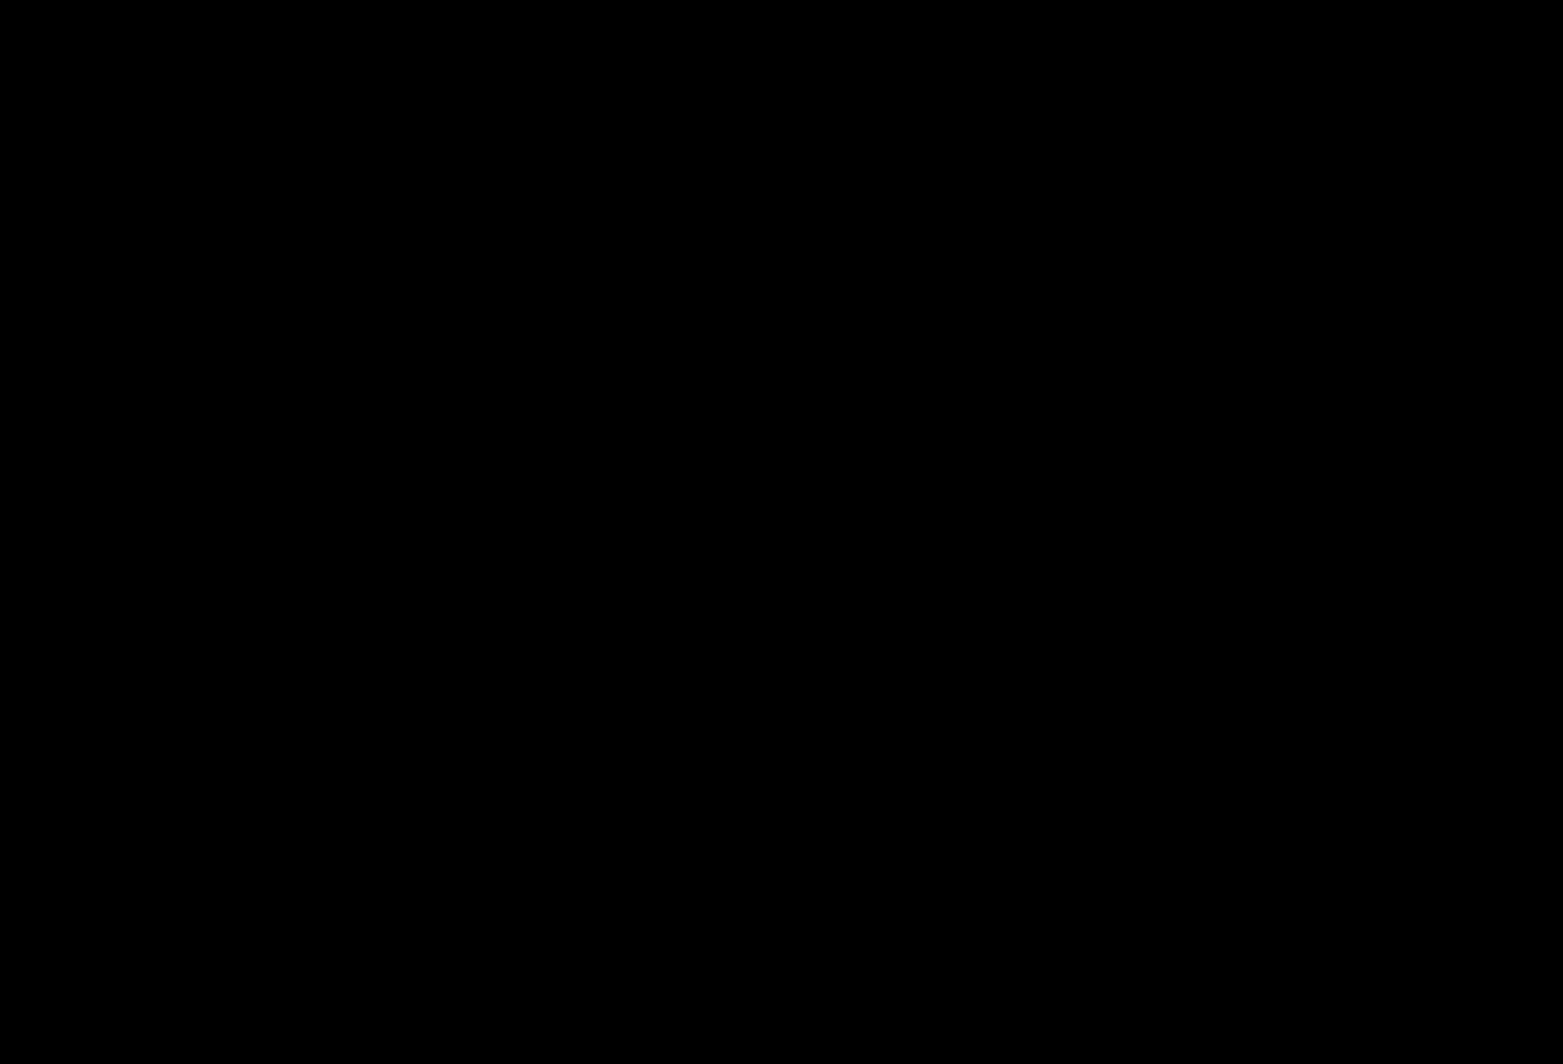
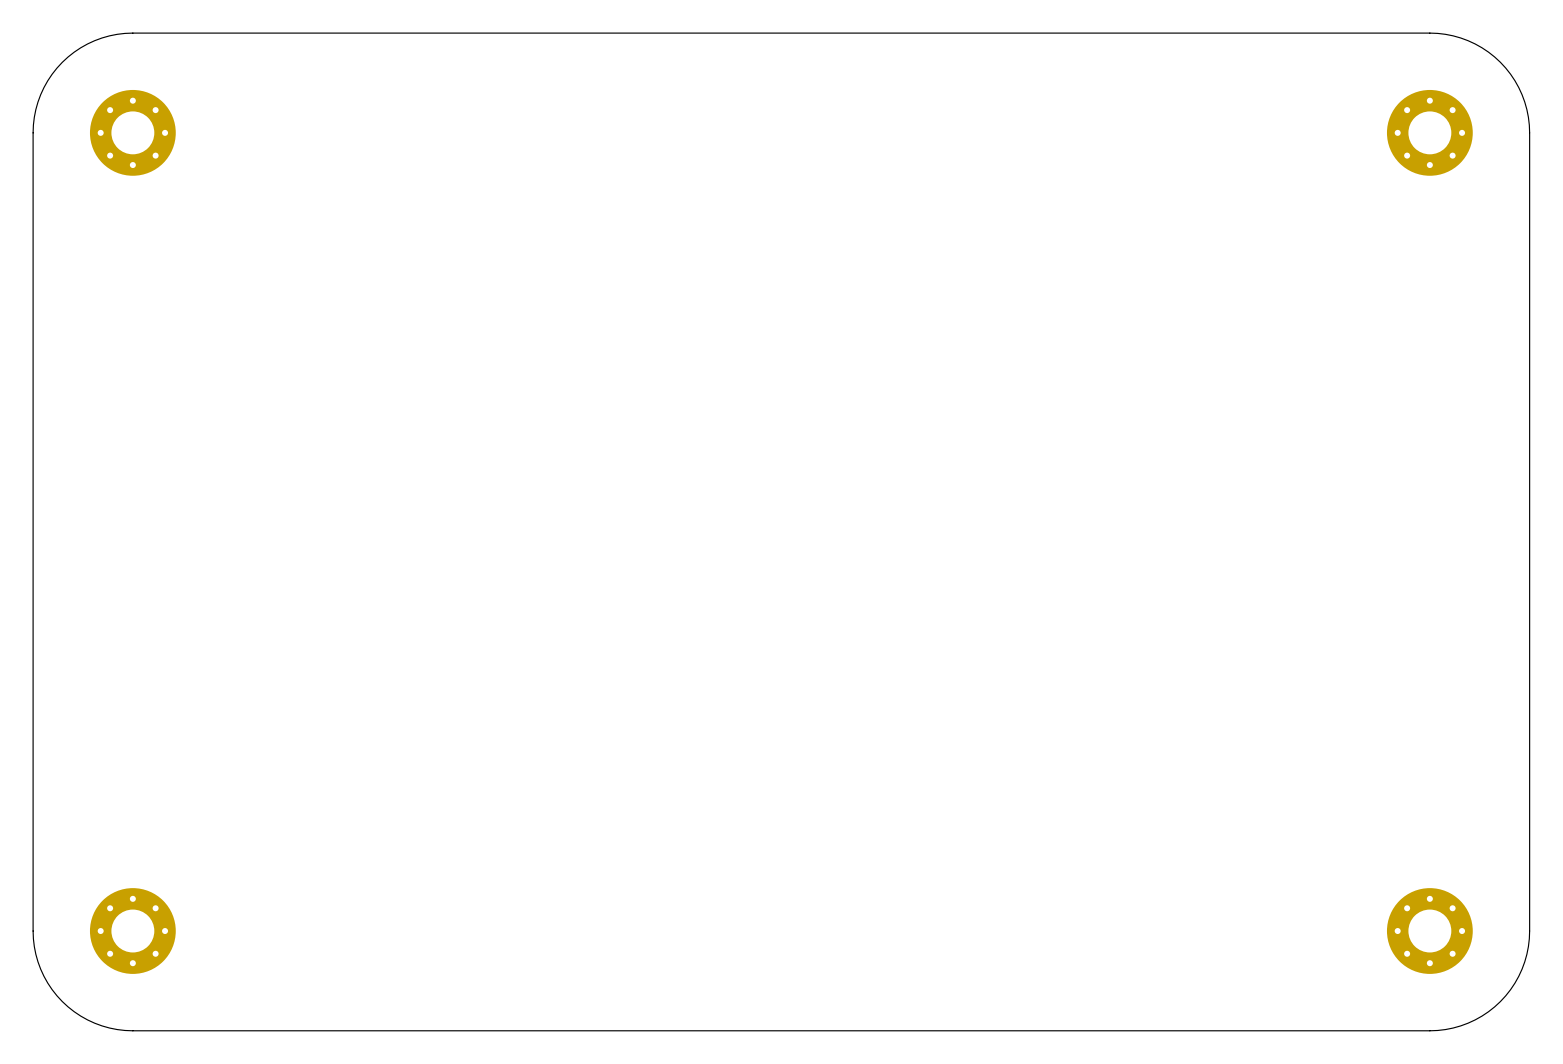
board edge: none -> (132, 33) (1429, 33) (1460, 37) (1488, 52) (1505, 68) (1518, 87) (1526, 109) (1529, 132) (1529, 931) (1524, 961) (1510, 989) (1494, 1006) (1475, 1019) (1453, 1028) (1429, 1030) (132, 1030) (102, 1025) (74, 1011) (57, 995) (43, 976) (35, 954) (33, 938) (33, 125) (35, 109) (43, 87) (52, 74) (68, 57) (87, 43) (102, 37) (132, 33)
part: none -> (132, 132)
part: none -> (1429, 132)
part: none -> (132, 931)
part: none -> (1429, 931)

